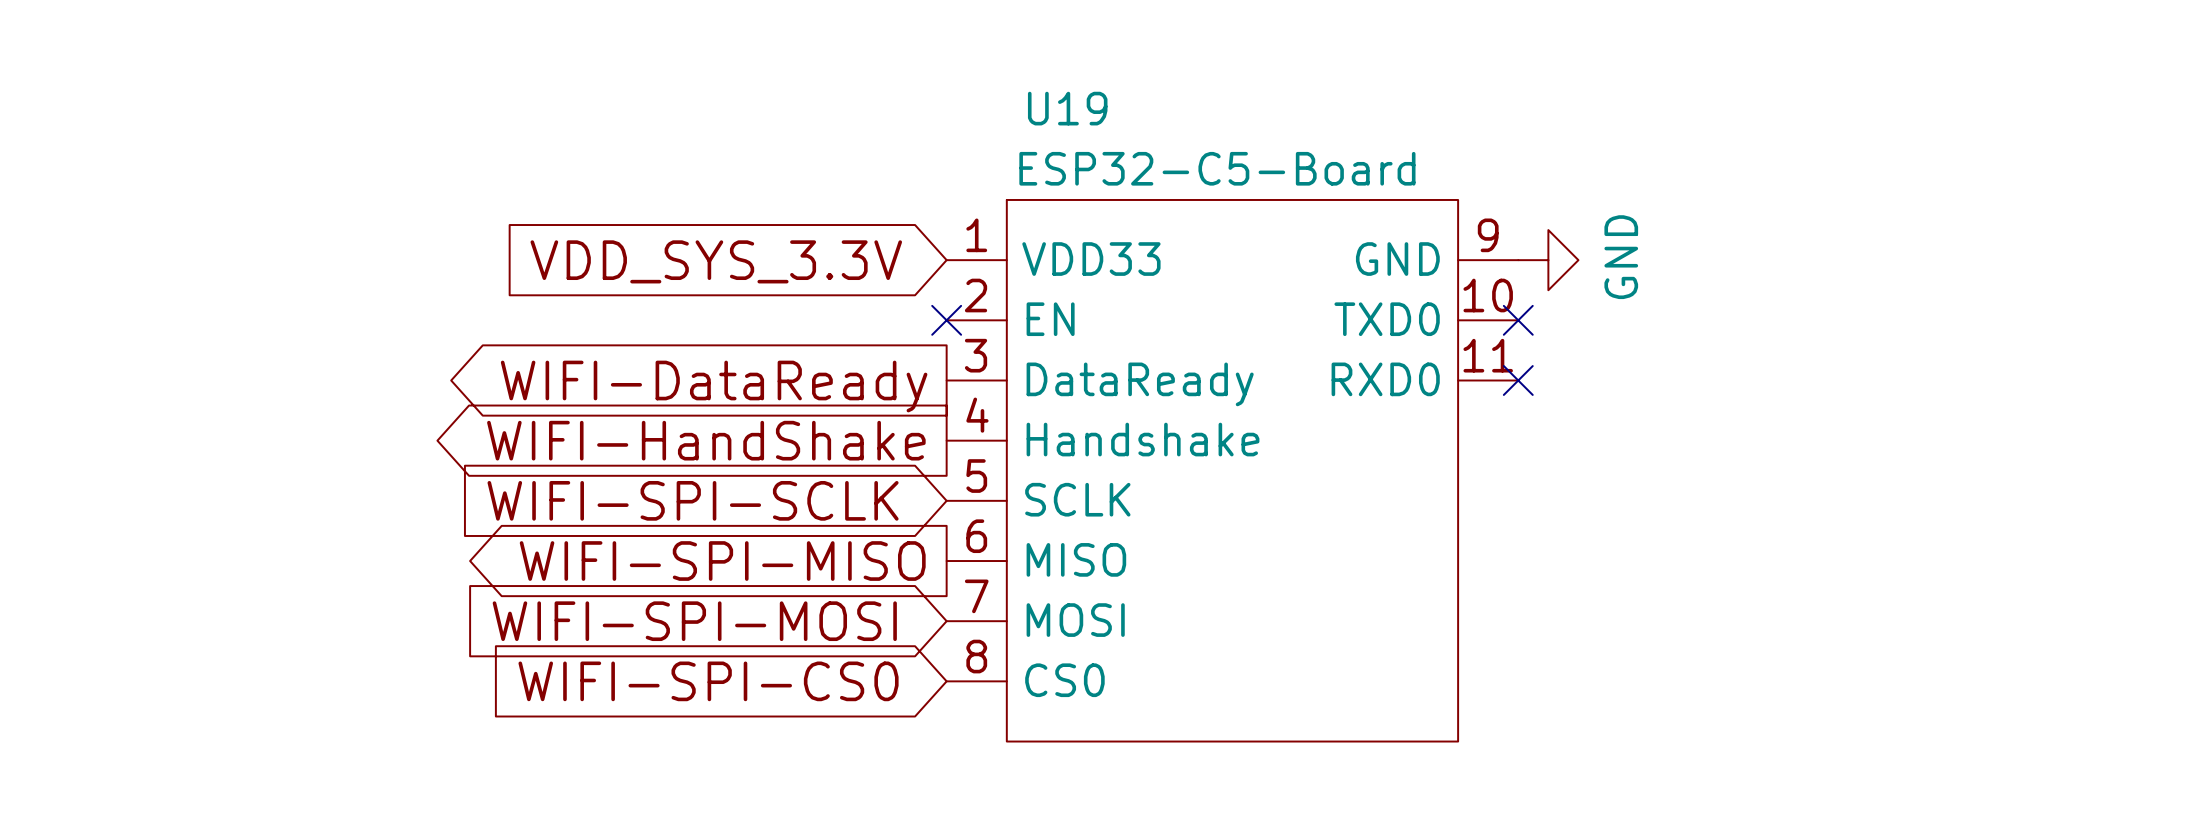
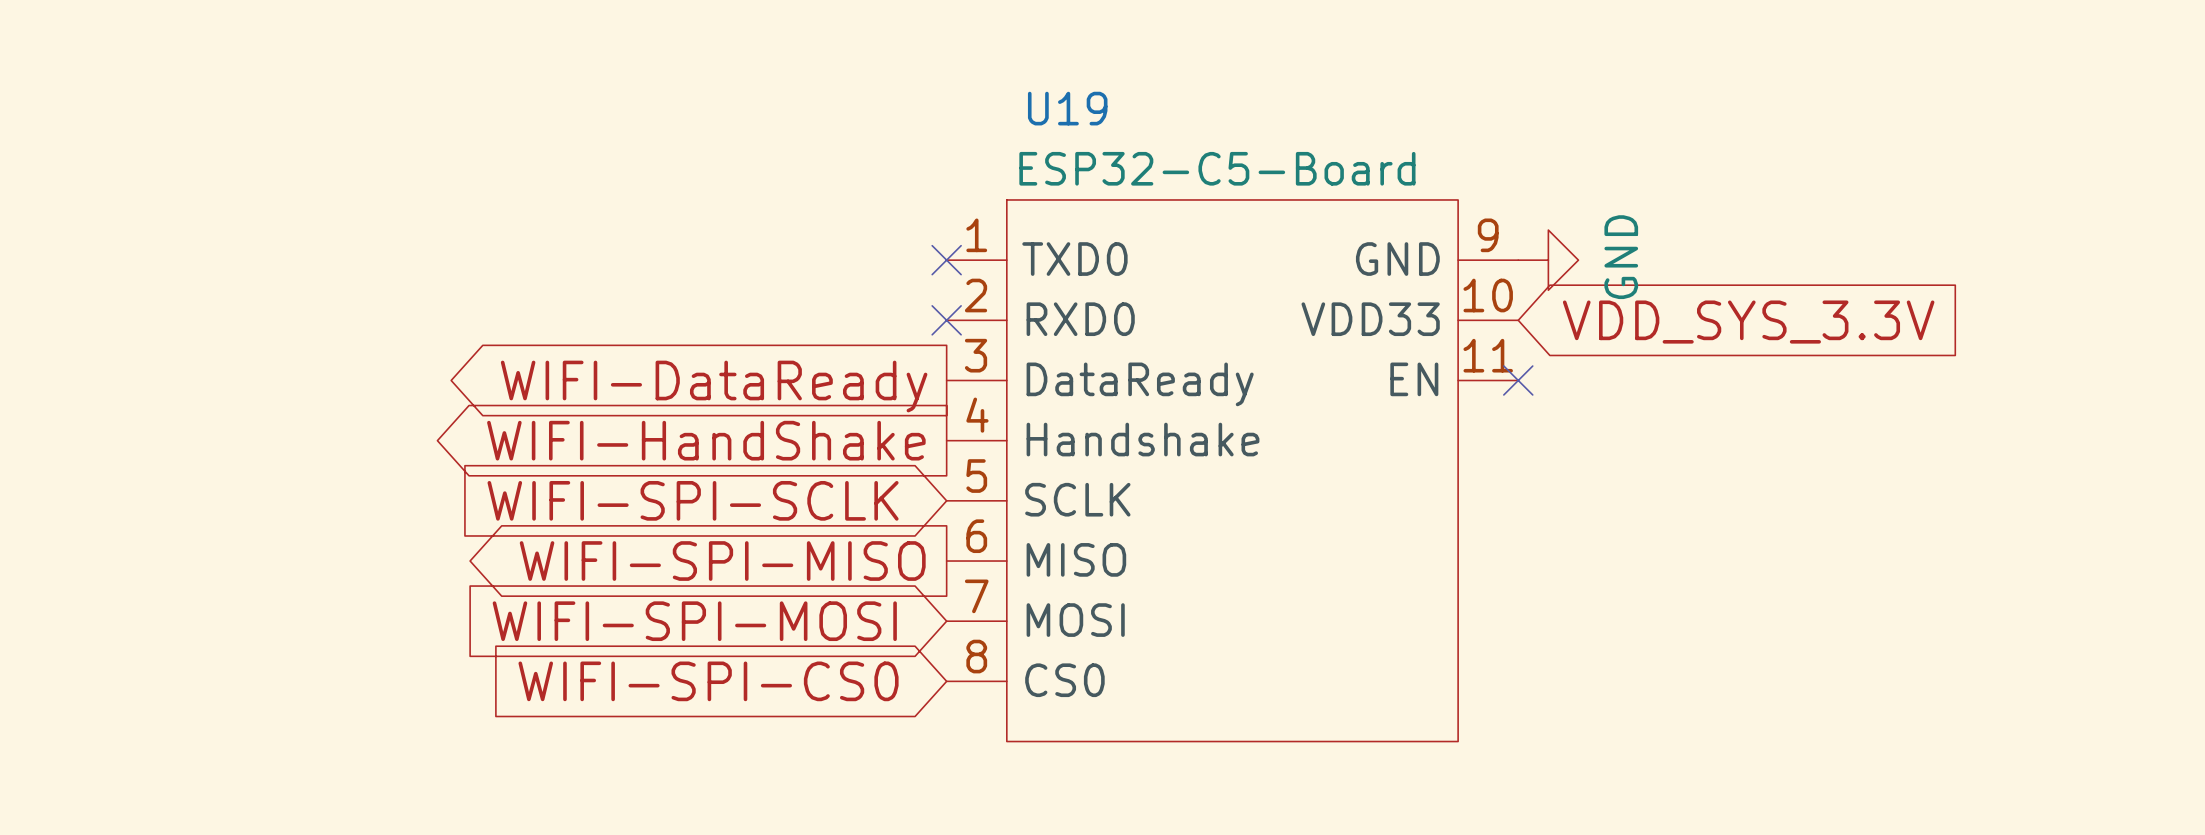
U19 pin name: VDD33 (1091, 259) -> TXD0 (1074, 259)
no-connect mark: none -> (946, 260)
global label rotation: 0° (716, 261) -> 180° (1748, 322)
global label position: VDD_SYS_3.3V (716, 261) -> VDD_SYS_3.3V (1748, 322)
U19 pin name: EN (1050, 319) -> RXD0 (1080, 319)
U19 pin name: TXD0 (1387, 319) -> VDD33 (1370, 319)
no-connect mark: (1518, 320) -> none
U19 pin name: RXD0 (1385, 379) -> EN (1414, 379)

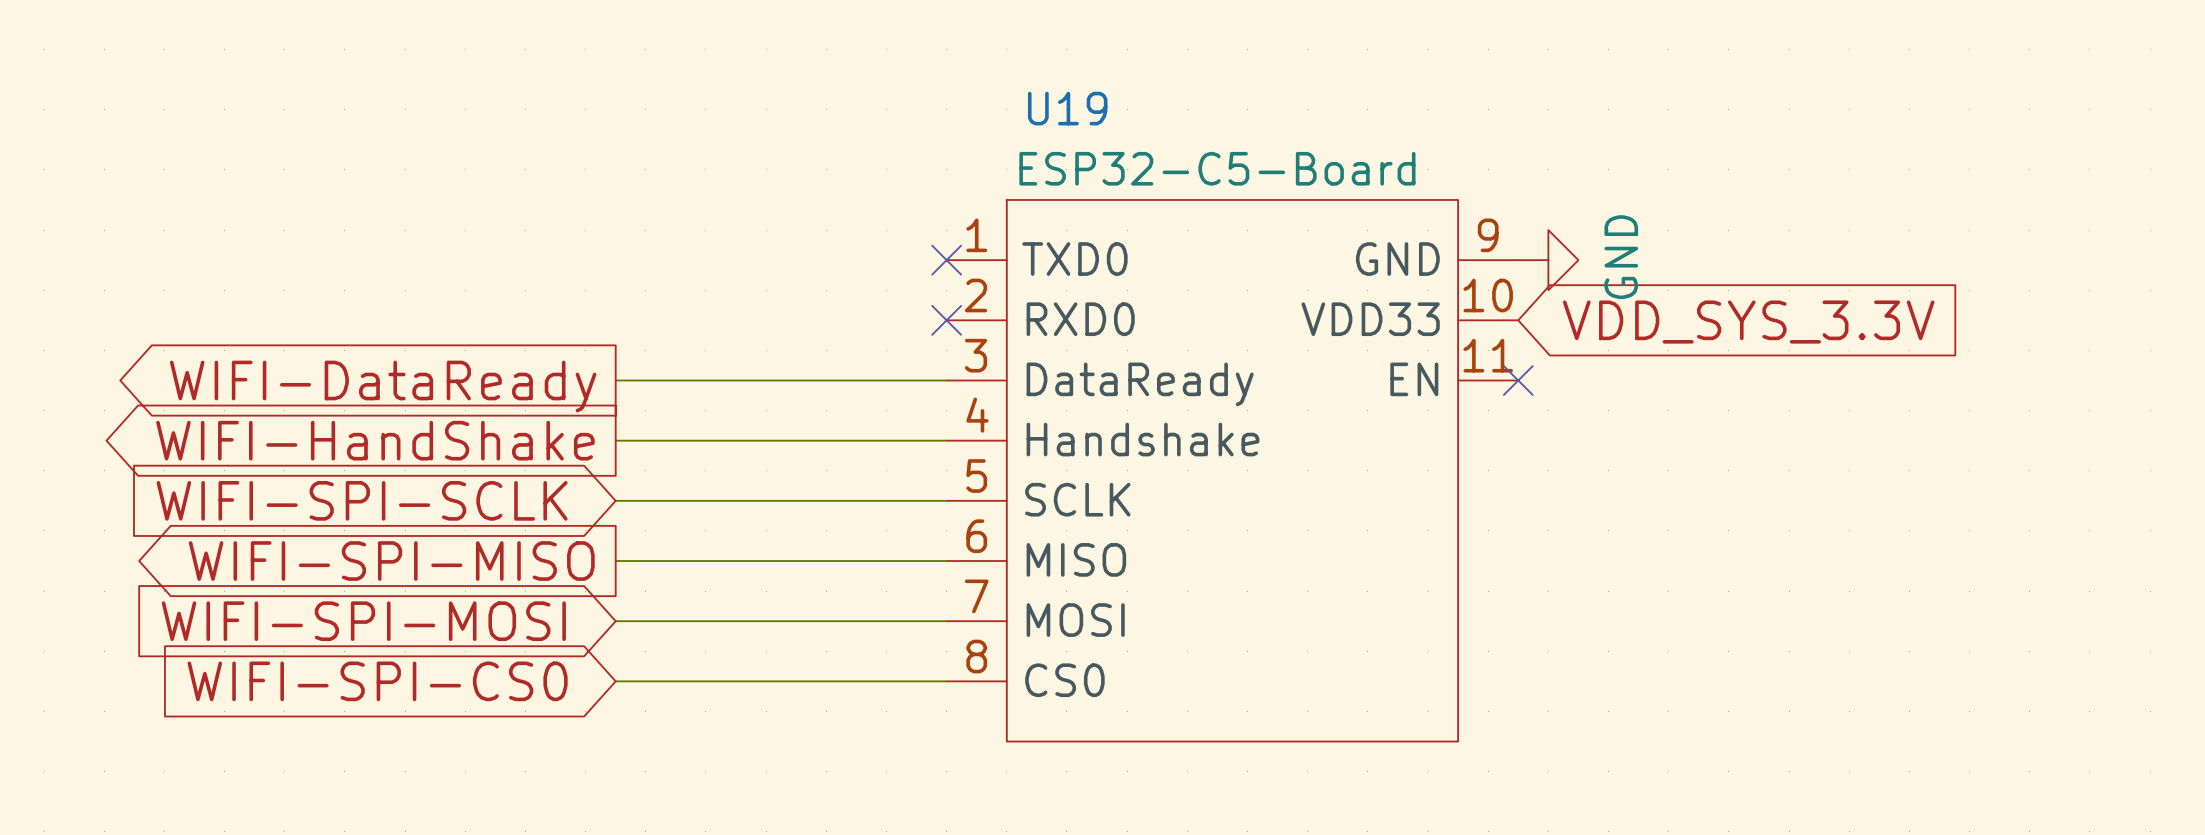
wire: none -> (615, 380) (946, 380)
global label position: WIFI-DataReady (714, 386) -> WIFI-DataReady (383, 386)
wire: none -> (615, 440) (946, 440)
global label position: WIFI-HandShake (706, 440) -> WIFI-HandShake (375, 440)
wire: none -> (615, 500) (946, 500)
global label position: WIFI-SPI-SCLK (693, 500) -> WIFI-SPI-SCLK (362, 500)
wire: none -> (615, 561) (946, 561)
global label position: WIFI-SPI-MISO (722, 561) -> WIFI-SPI-MISO (391, 561)
wire: none -> (615, 621) (946, 621)
global label position: WIFI-SPI-MOSI (694, 621) -> WIFI-SPI-MOSI (363, 621)
wire: none -> (615, 681) (946, 681)
global label position: WIFI-SPI-CS0 (708, 681) -> WIFI-SPI-CS0 (377, 681)

